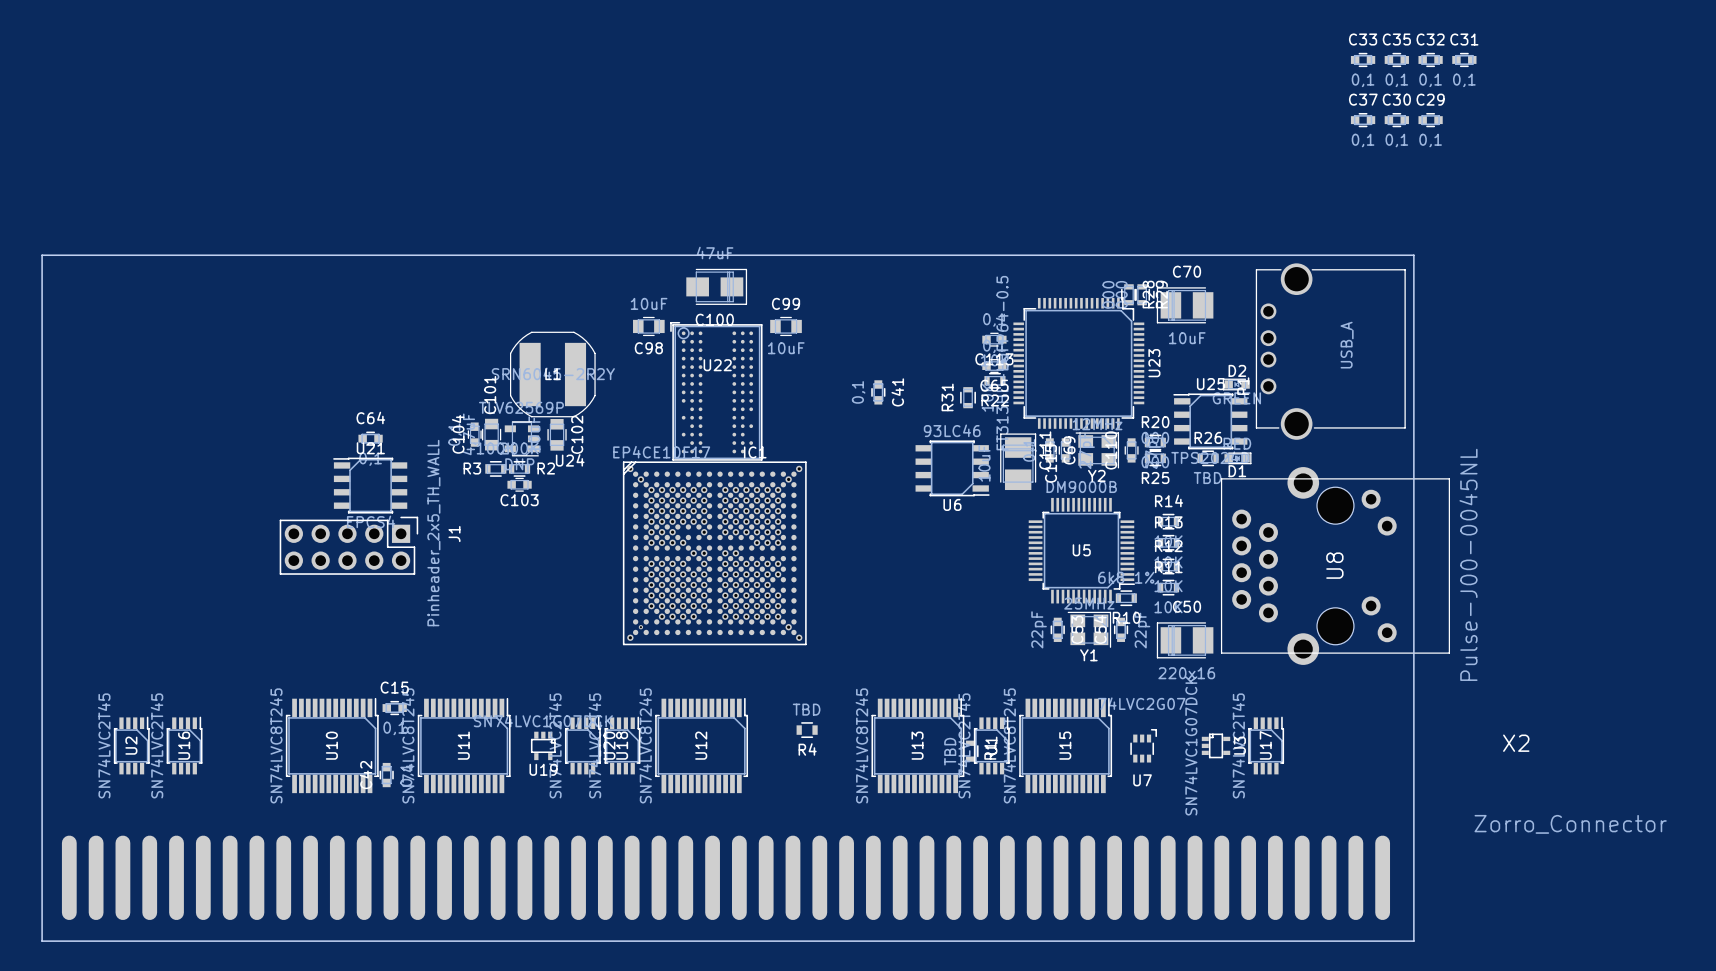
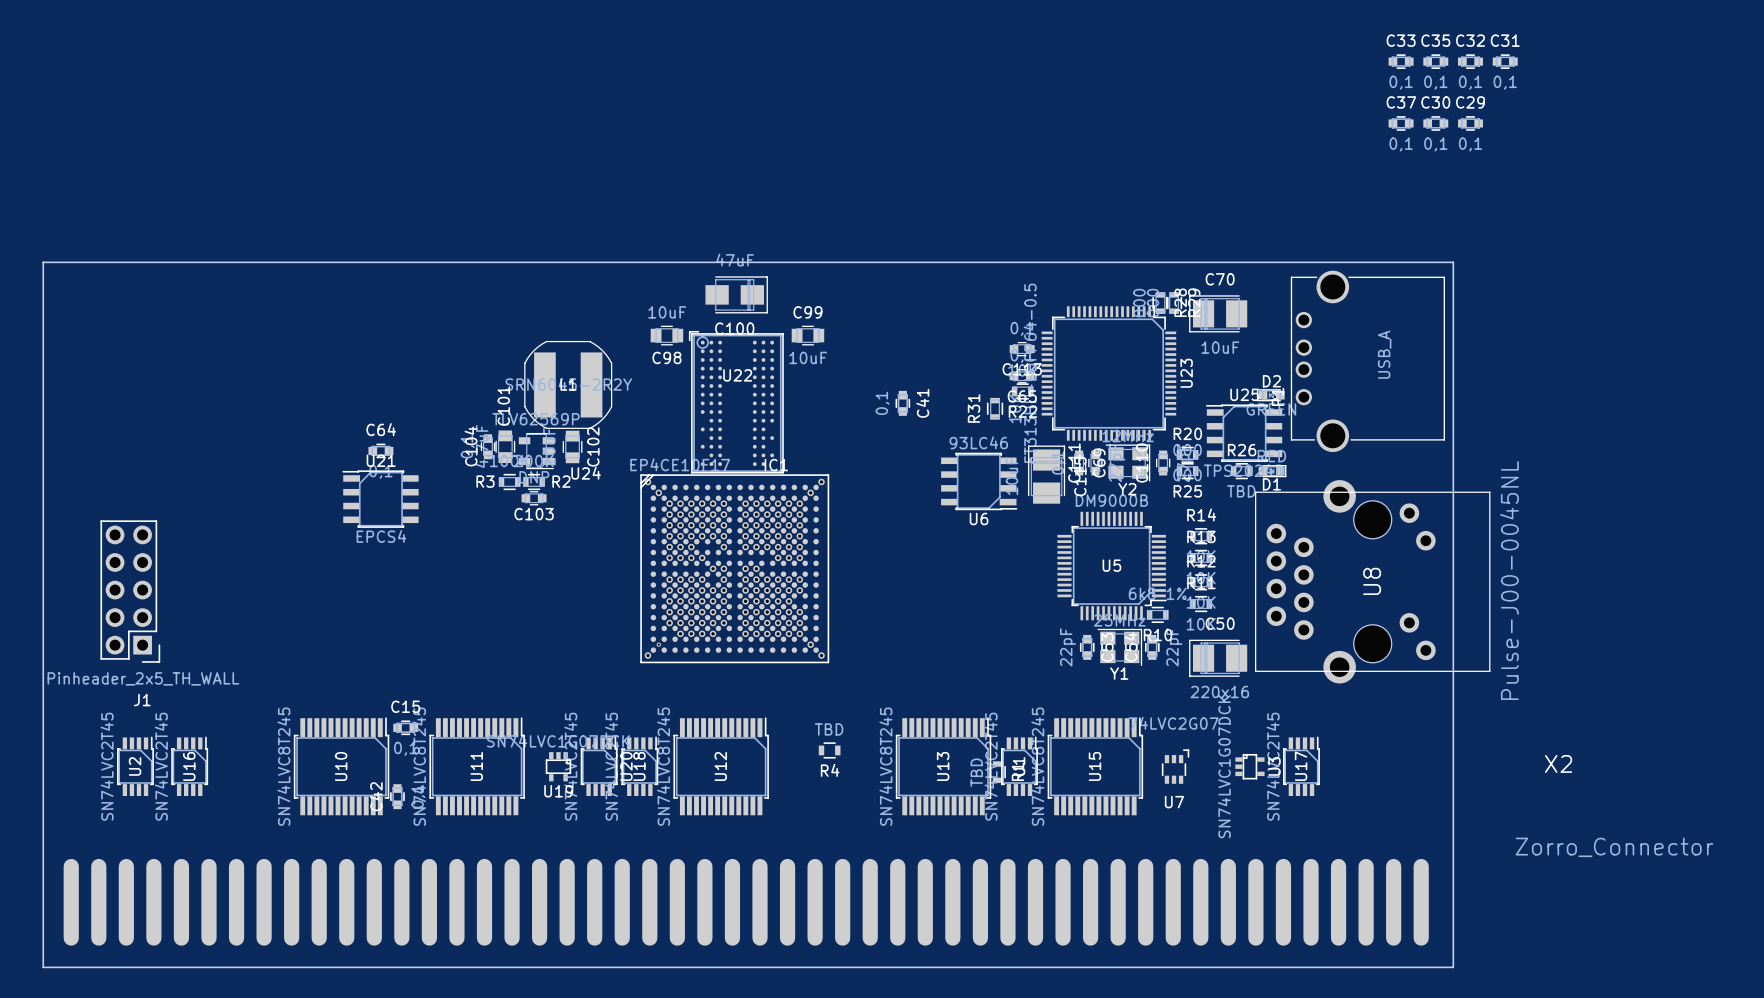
J1 rotation: 0° (348, 545) -> 90° clockwise (130, 591)
J1 position: (348, 545) -> (130, 591)

